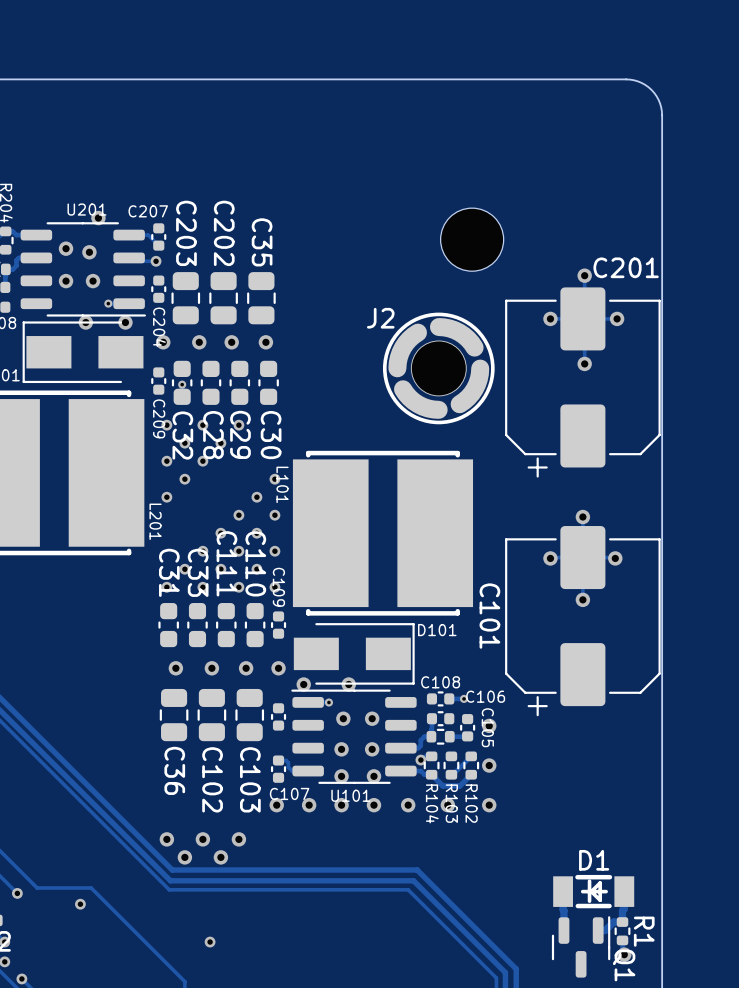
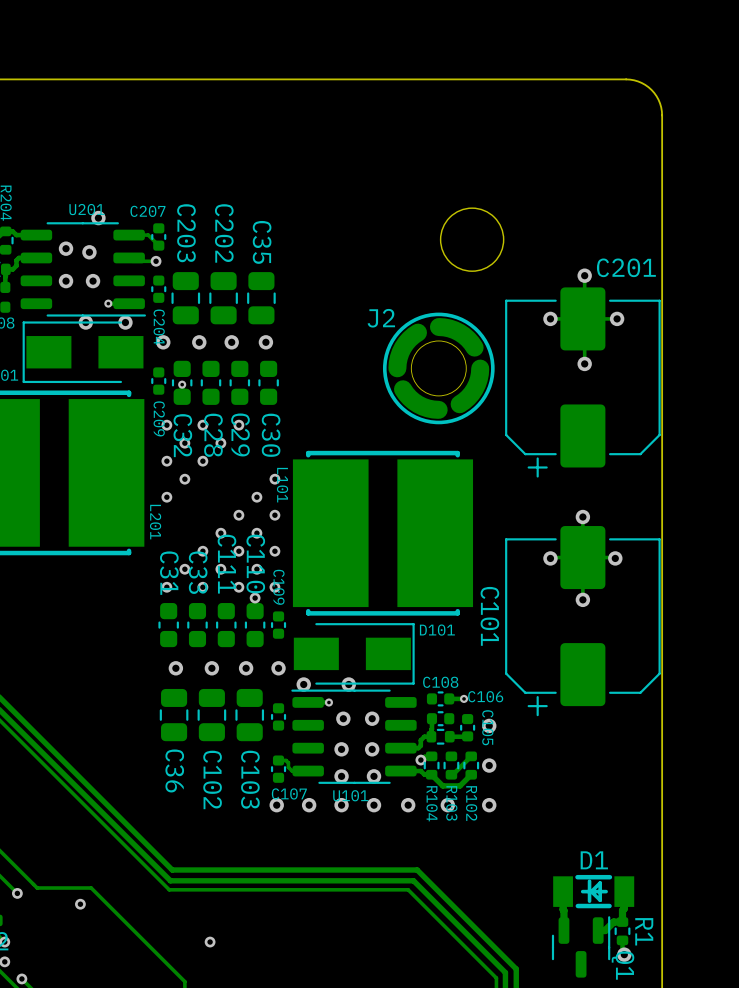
via: none -> (255, 598)
via: (166, 839) -> none
via: (202, 839) -> none
via: (238, 839) -> none
via: (184, 857) -> none
via: (220, 857) -> none

